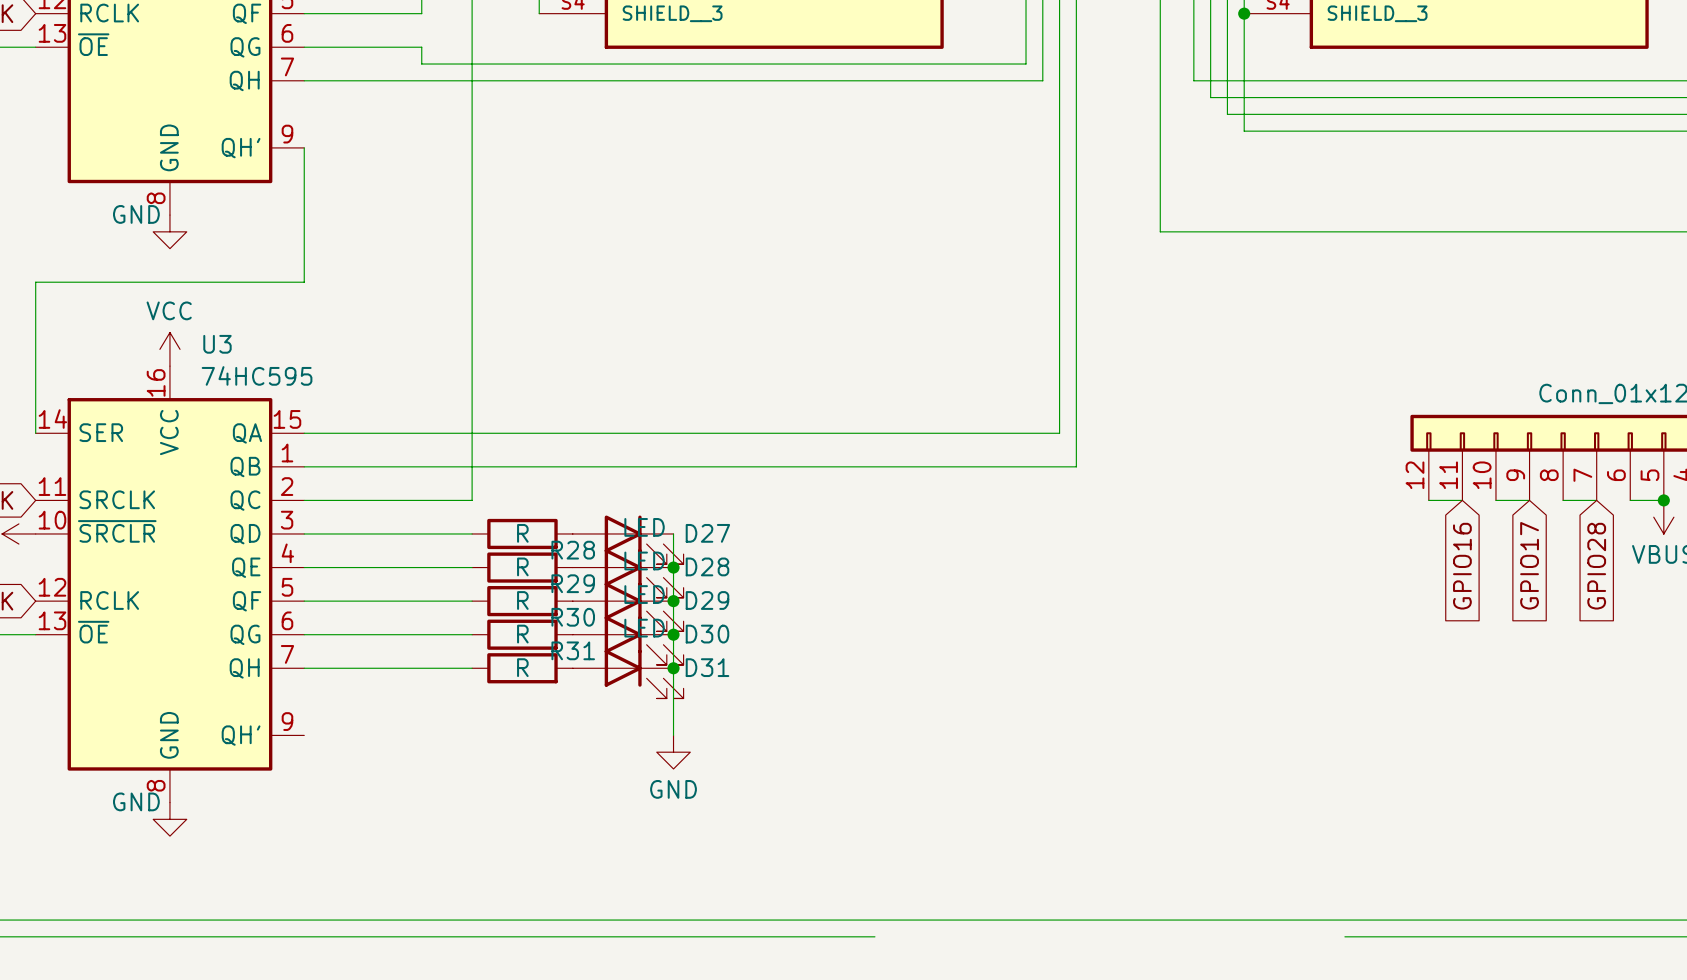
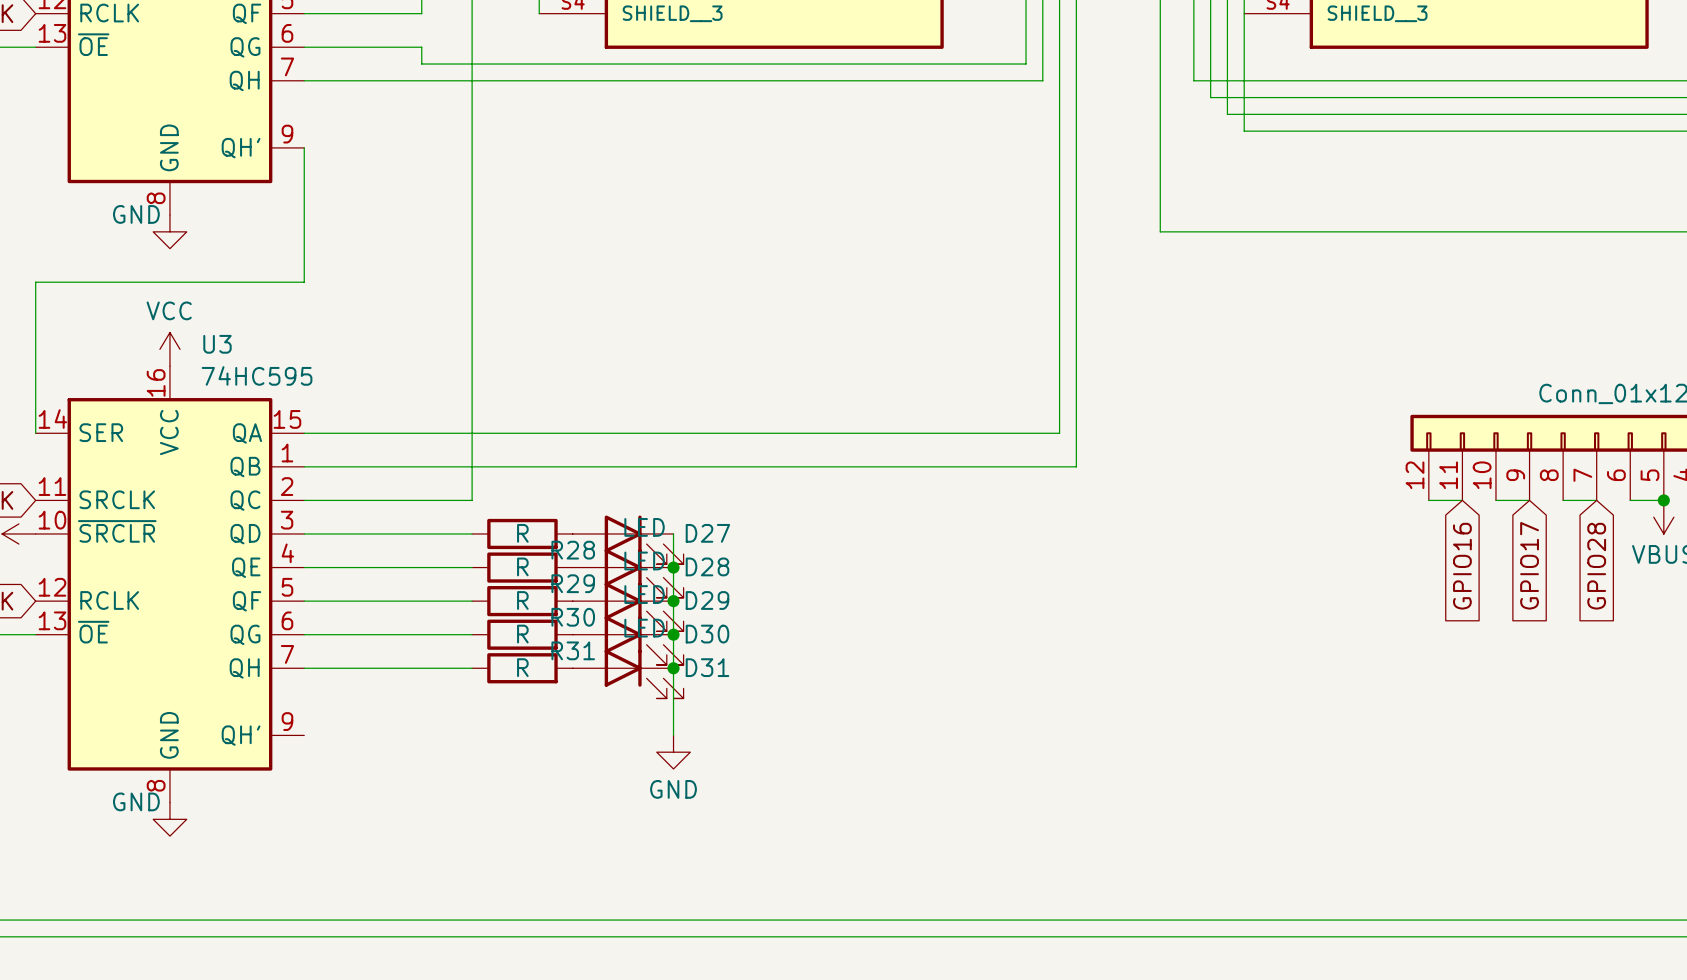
junction: (1244, 13) -> none
wire: none -> (874, 936) (1344, 936)

